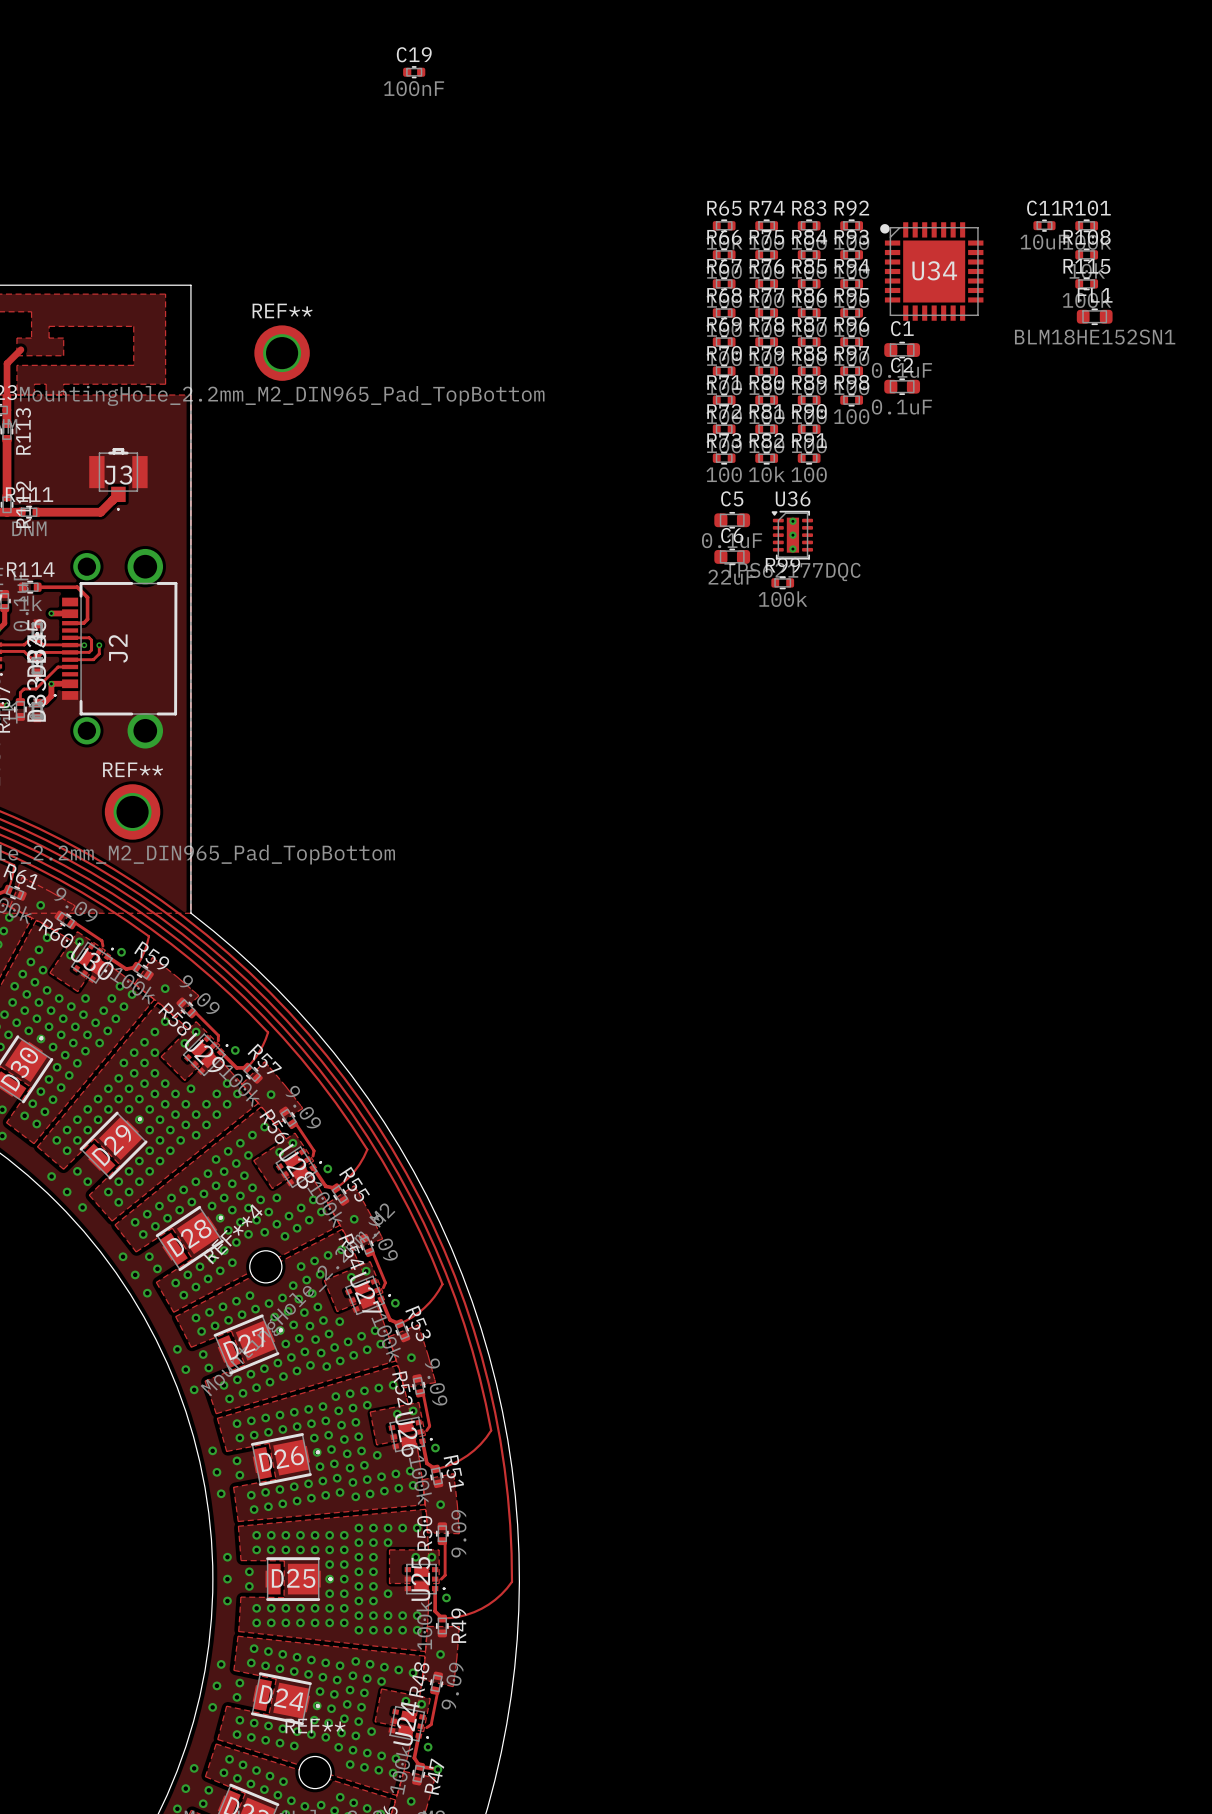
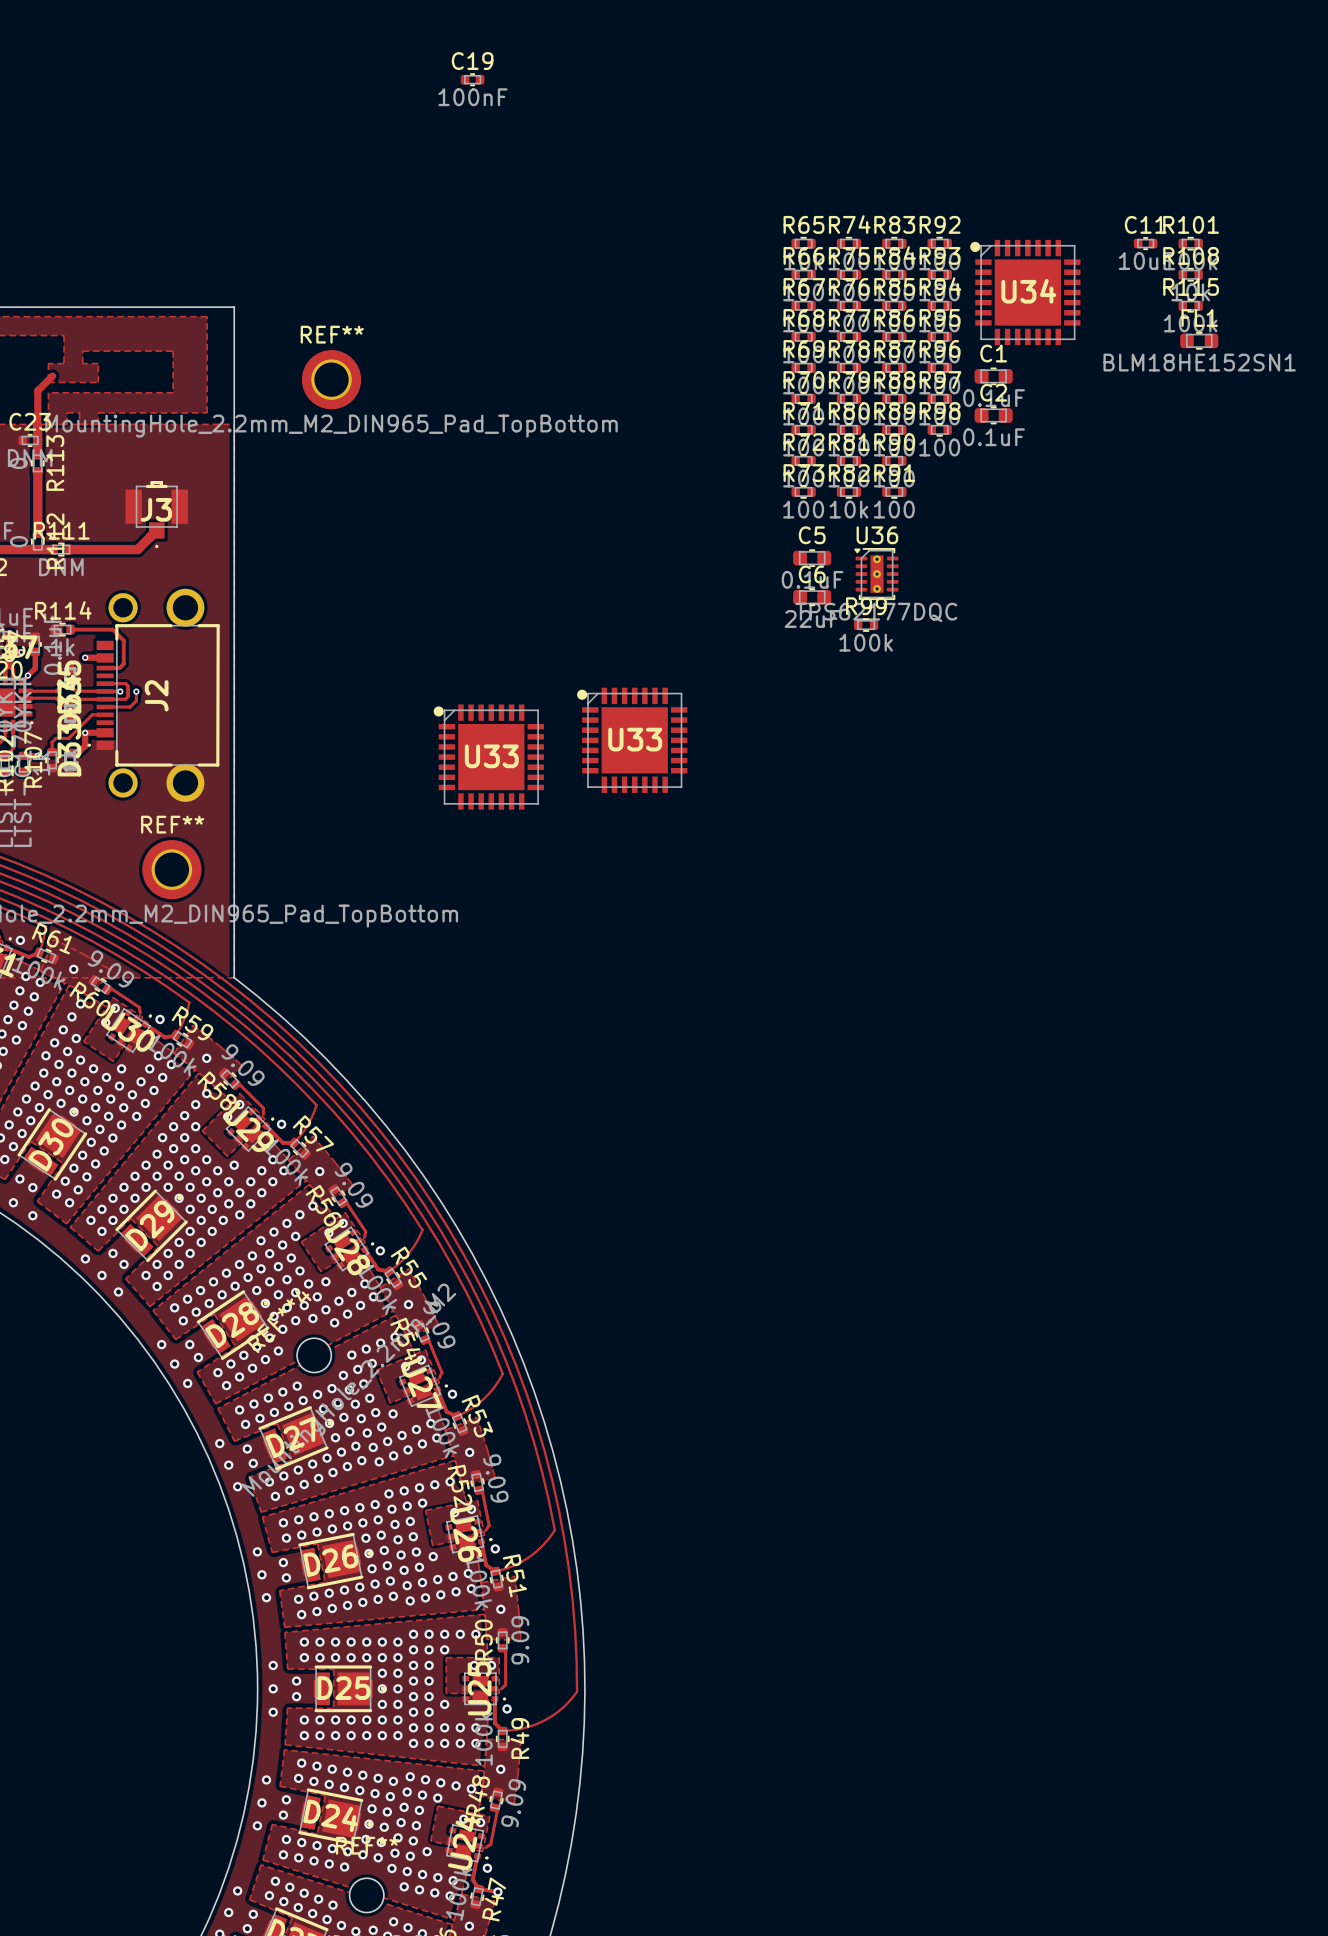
U33: none -> (632, 740)
U33: none -> (488, 757)

